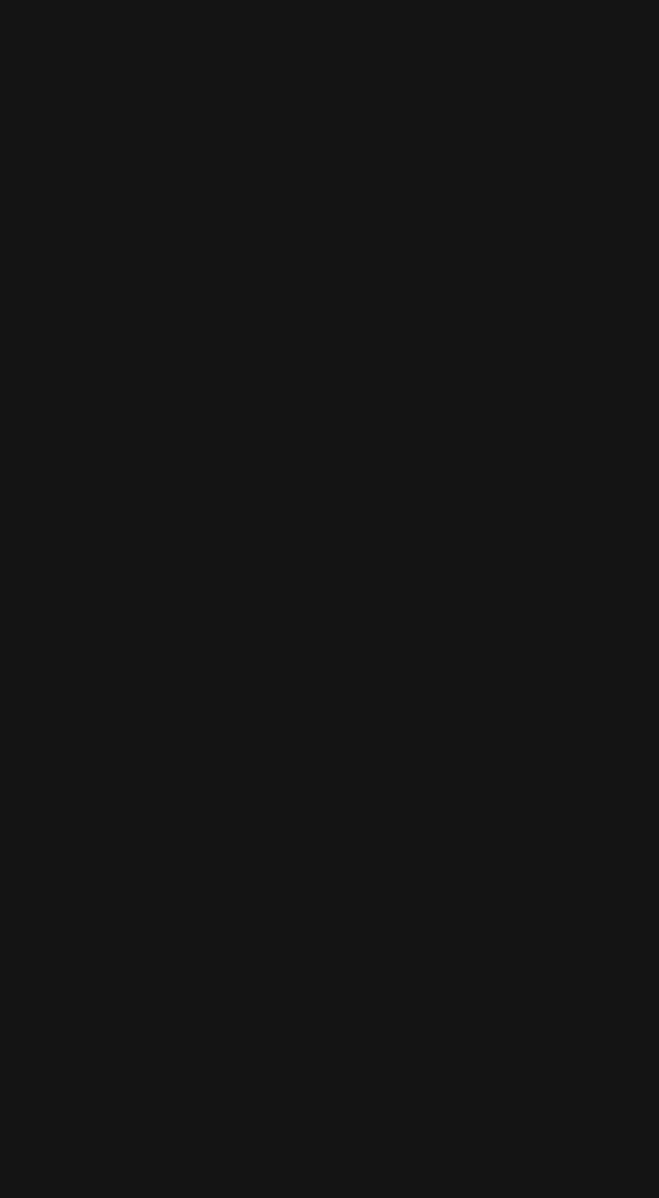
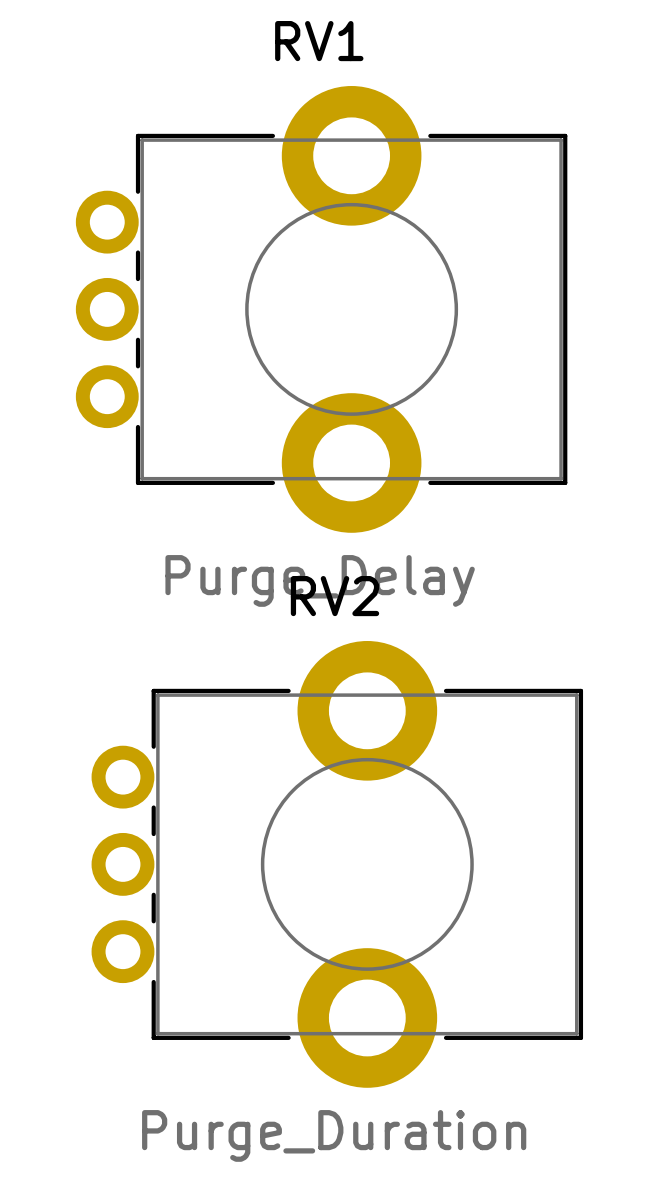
RV1: none -> Purge_Delay (321, 309)
RV2: none -> Purge_Duration (337, 864)

